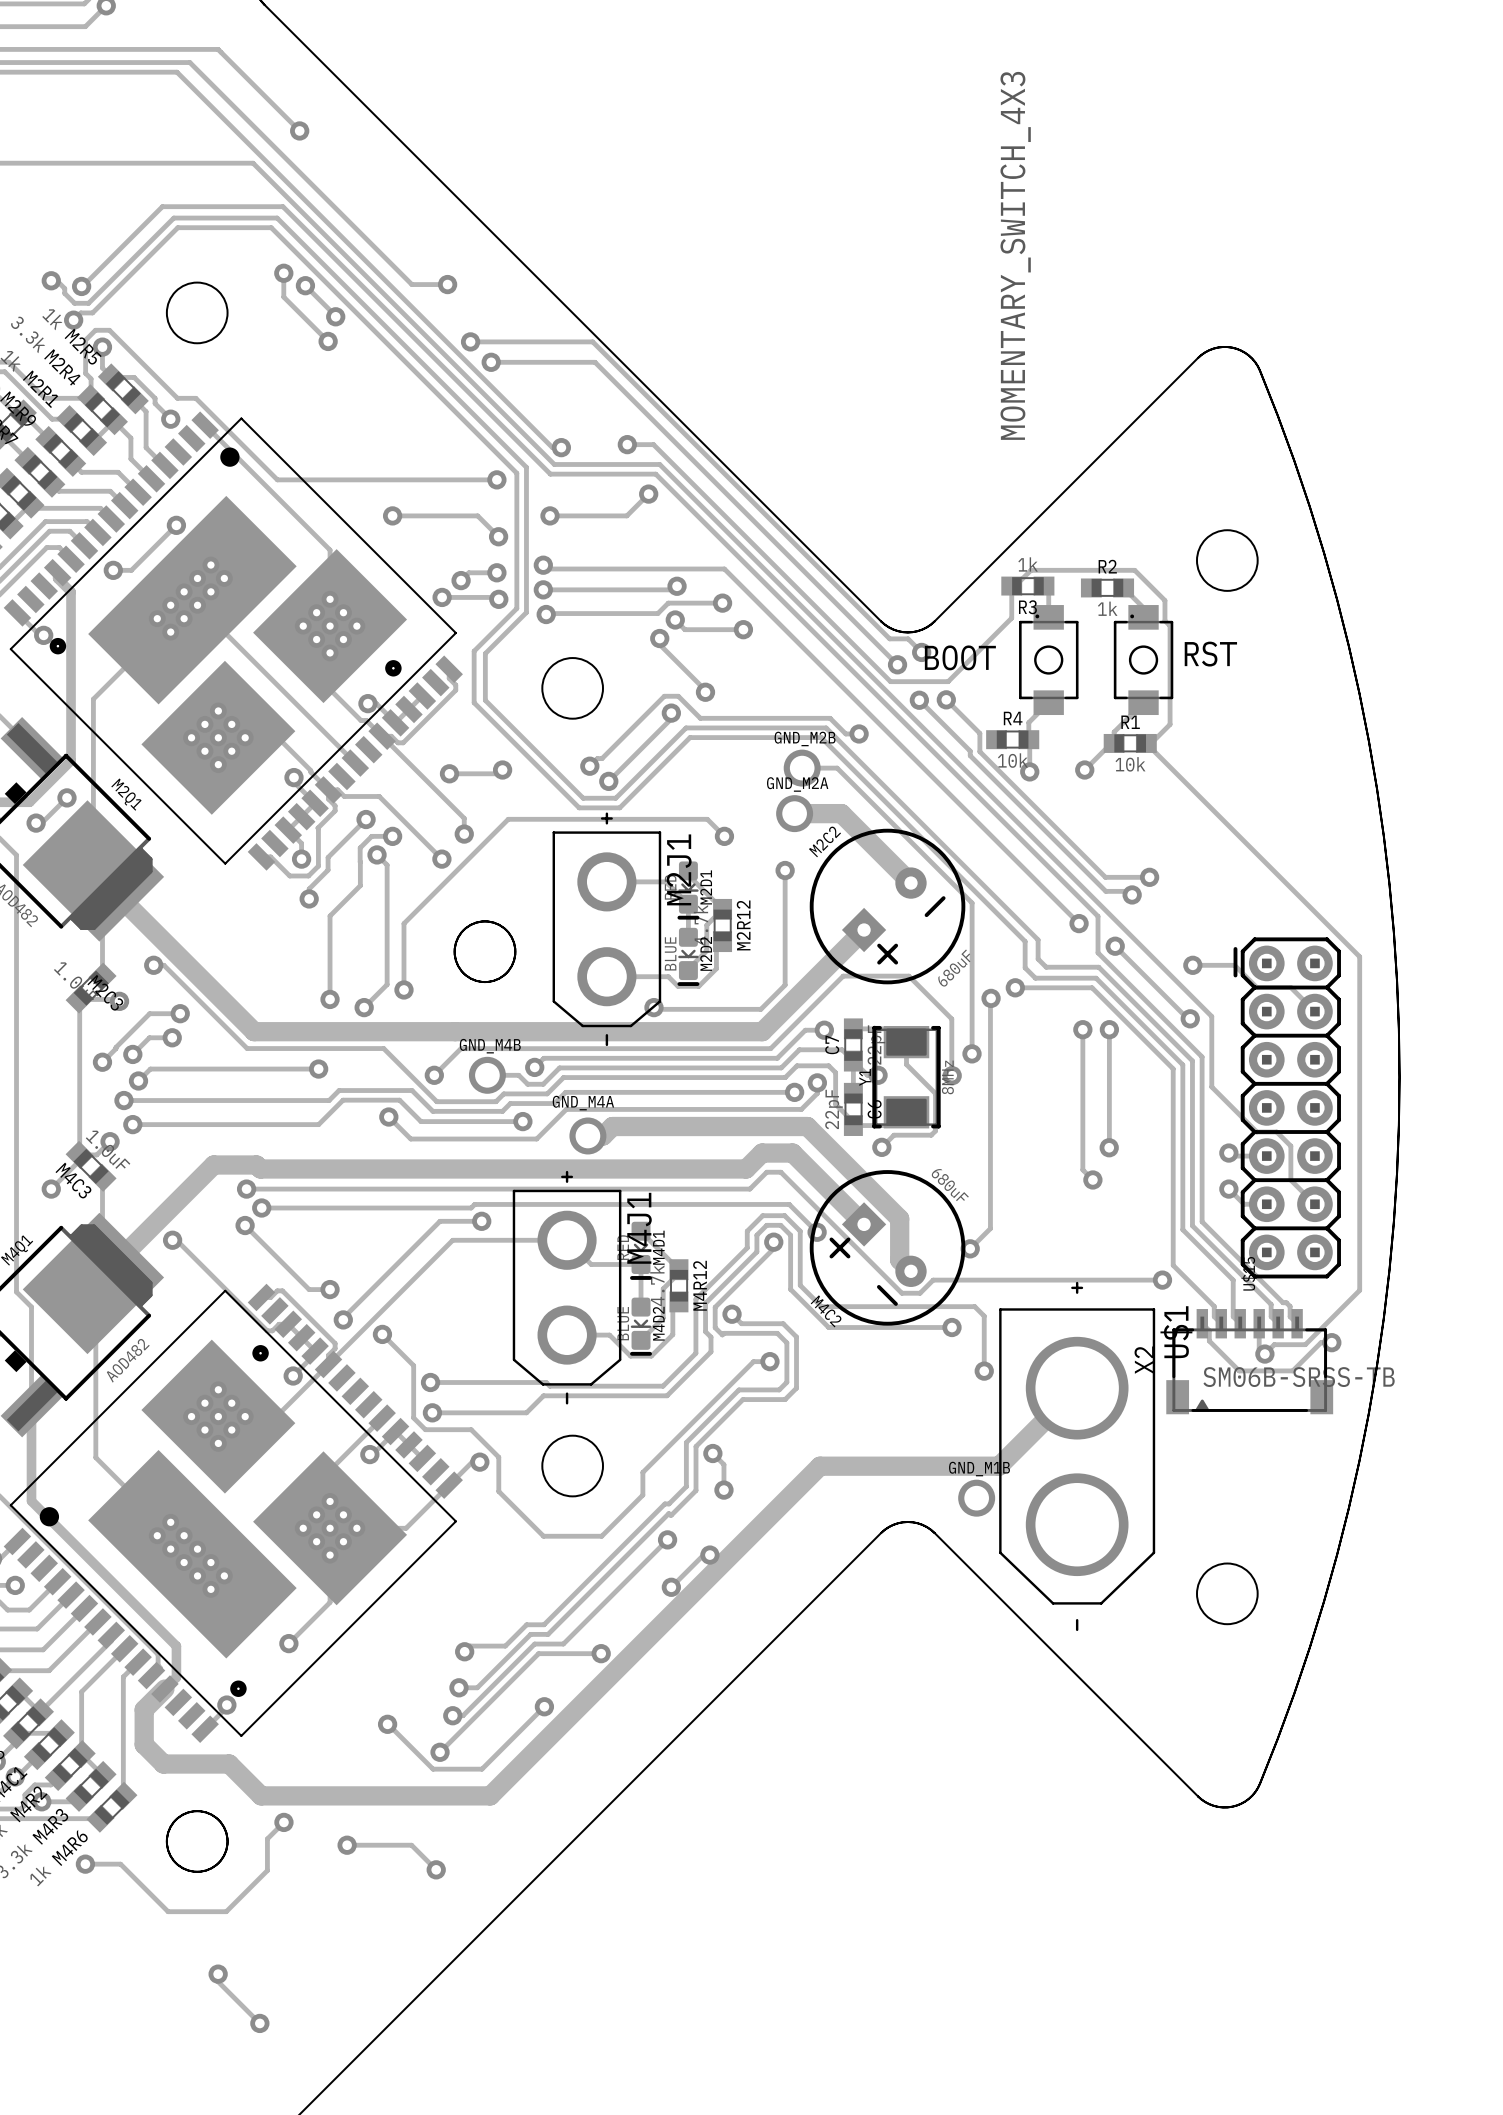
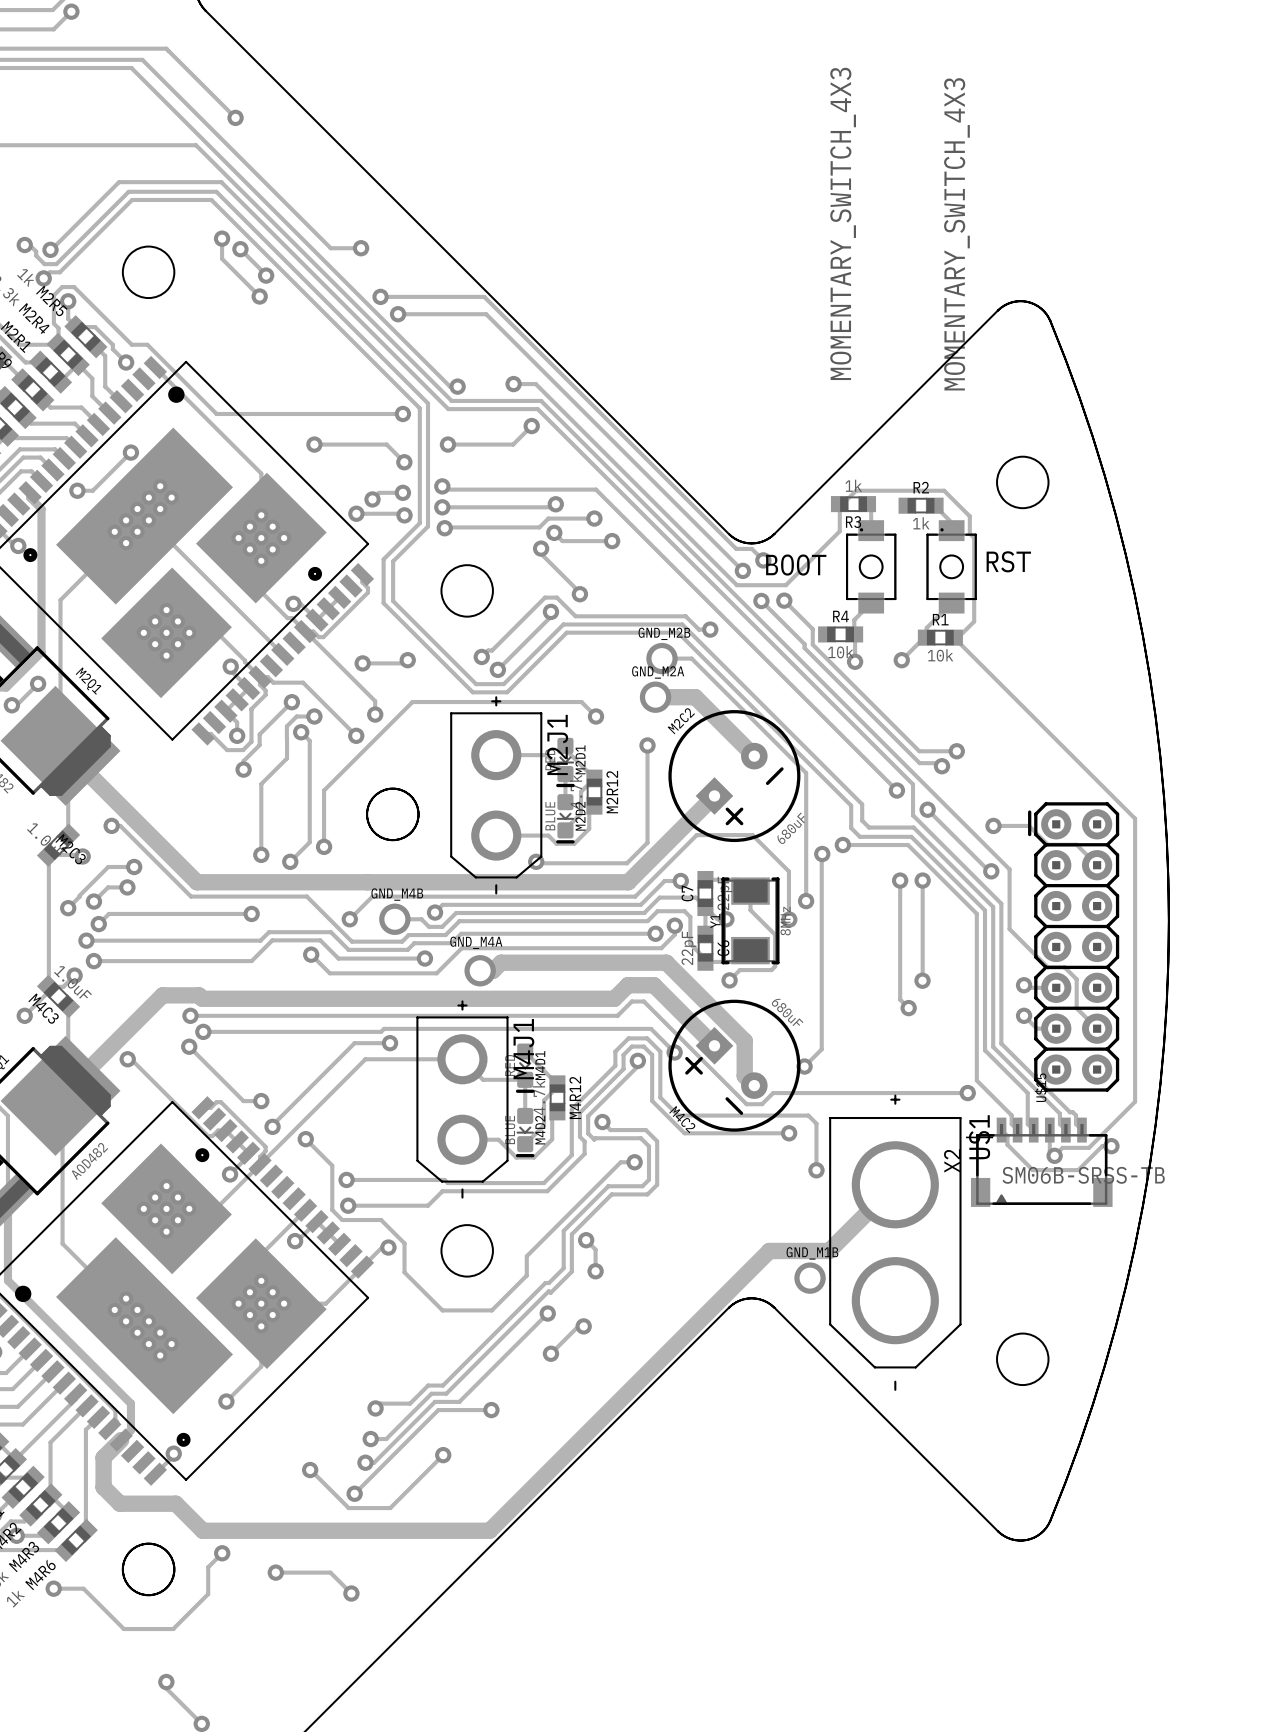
RST value: none -> MOMENTARY_SWITCH_4X3 (956, 234)
track: (928, 1466) (820, 1466) (490, 1795) -> (769, 1250) (489, 1530) (397, 1530)

